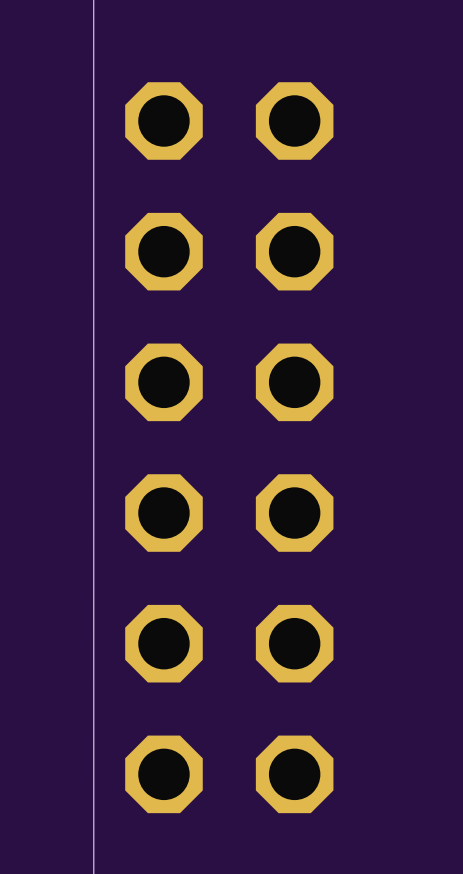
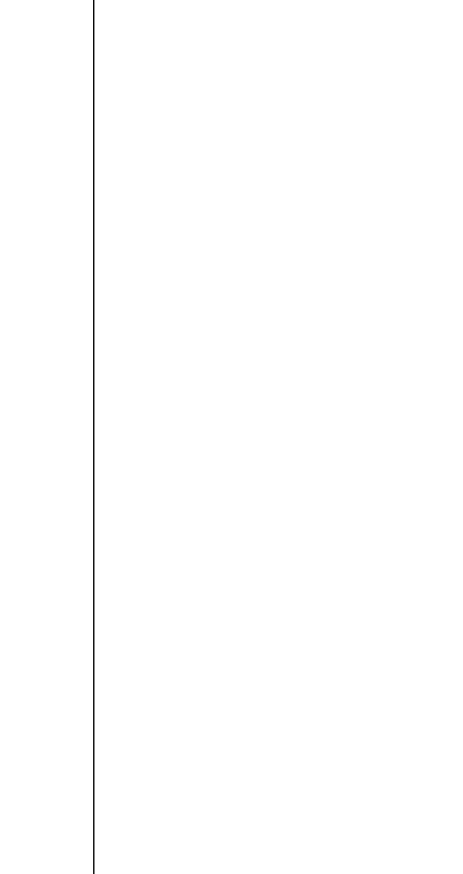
part: (229, 447) -> none

